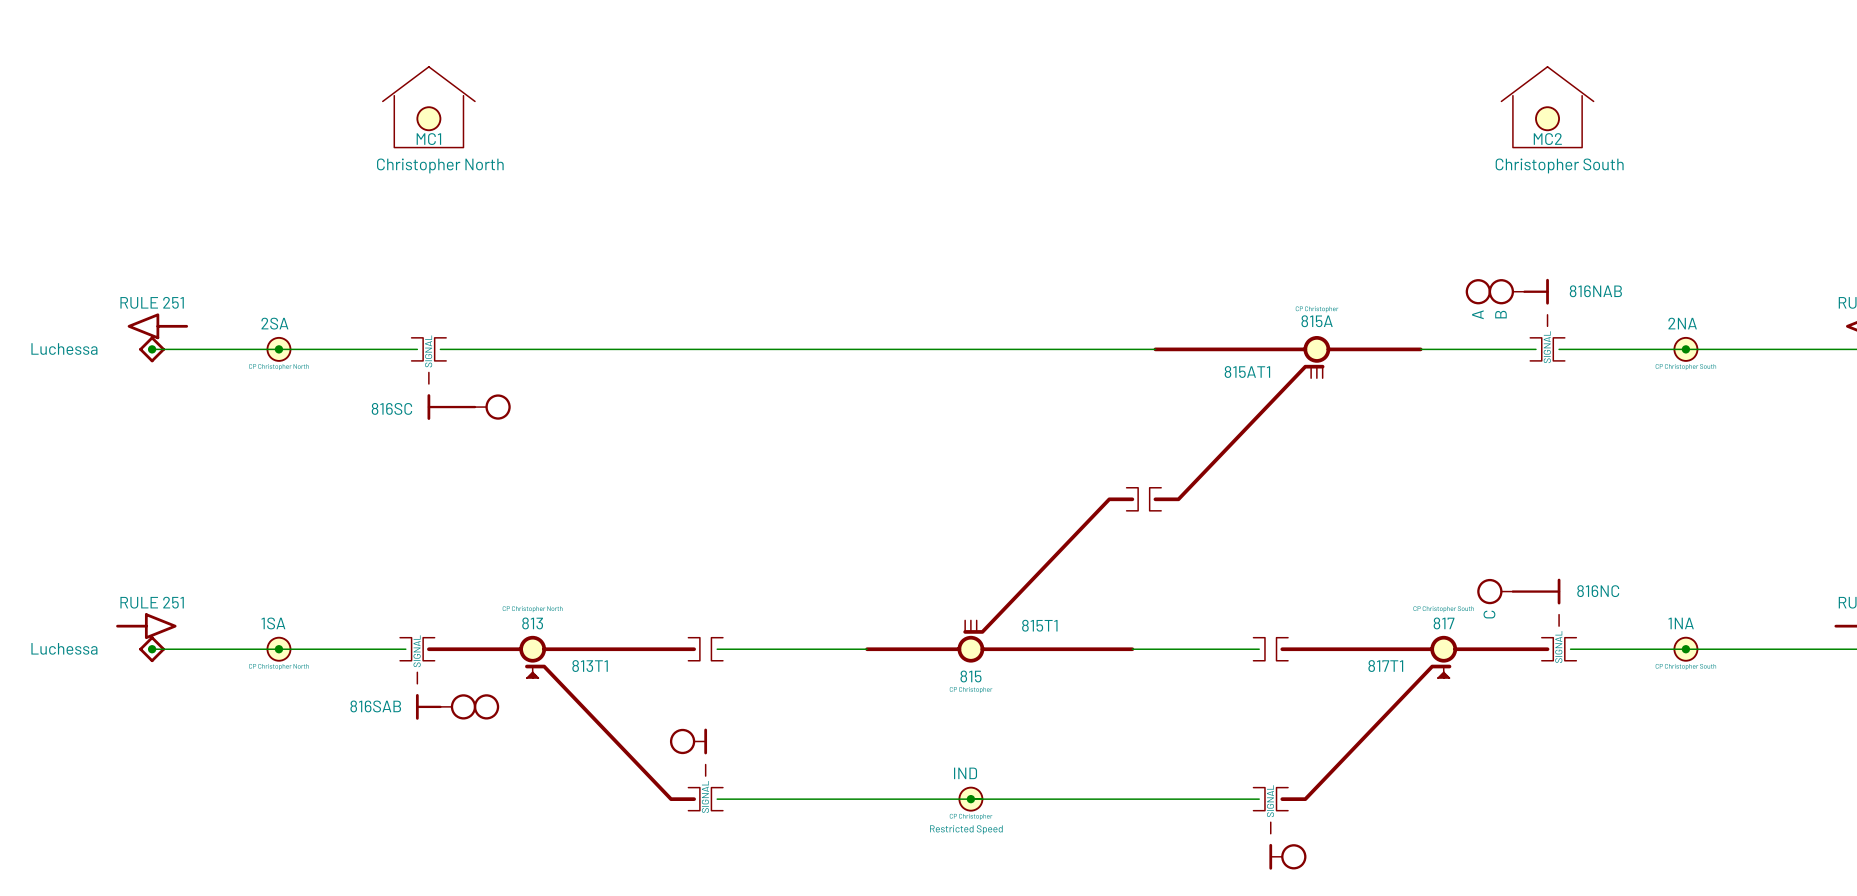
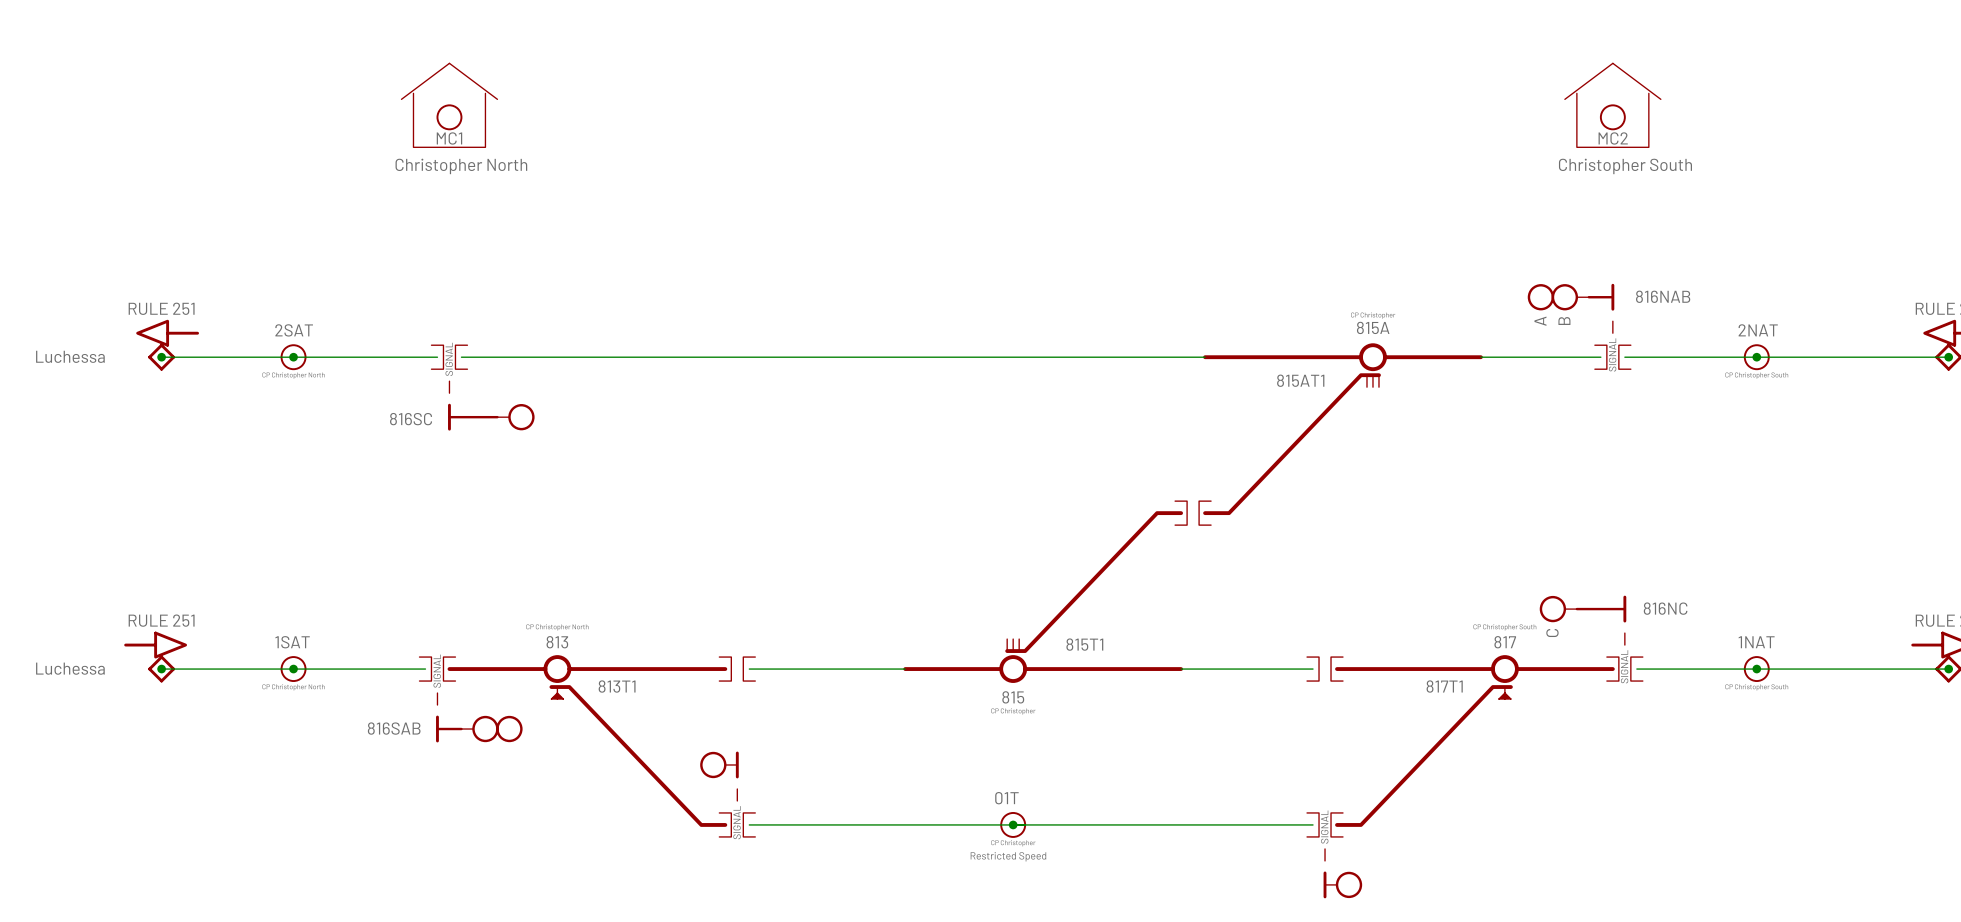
part value: 2SA (274, 323) -> 2SAT (294, 330)
part value: 2NA (1682, 323) -> 2NAT (1758, 330)
part value: 1SA (273, 623) -> 1SAT (292, 642)
part value: 1NA (1681, 623) -> 1NAT (1756, 642)
part value: IND (965, 773) -> 01T (1006, 798)

